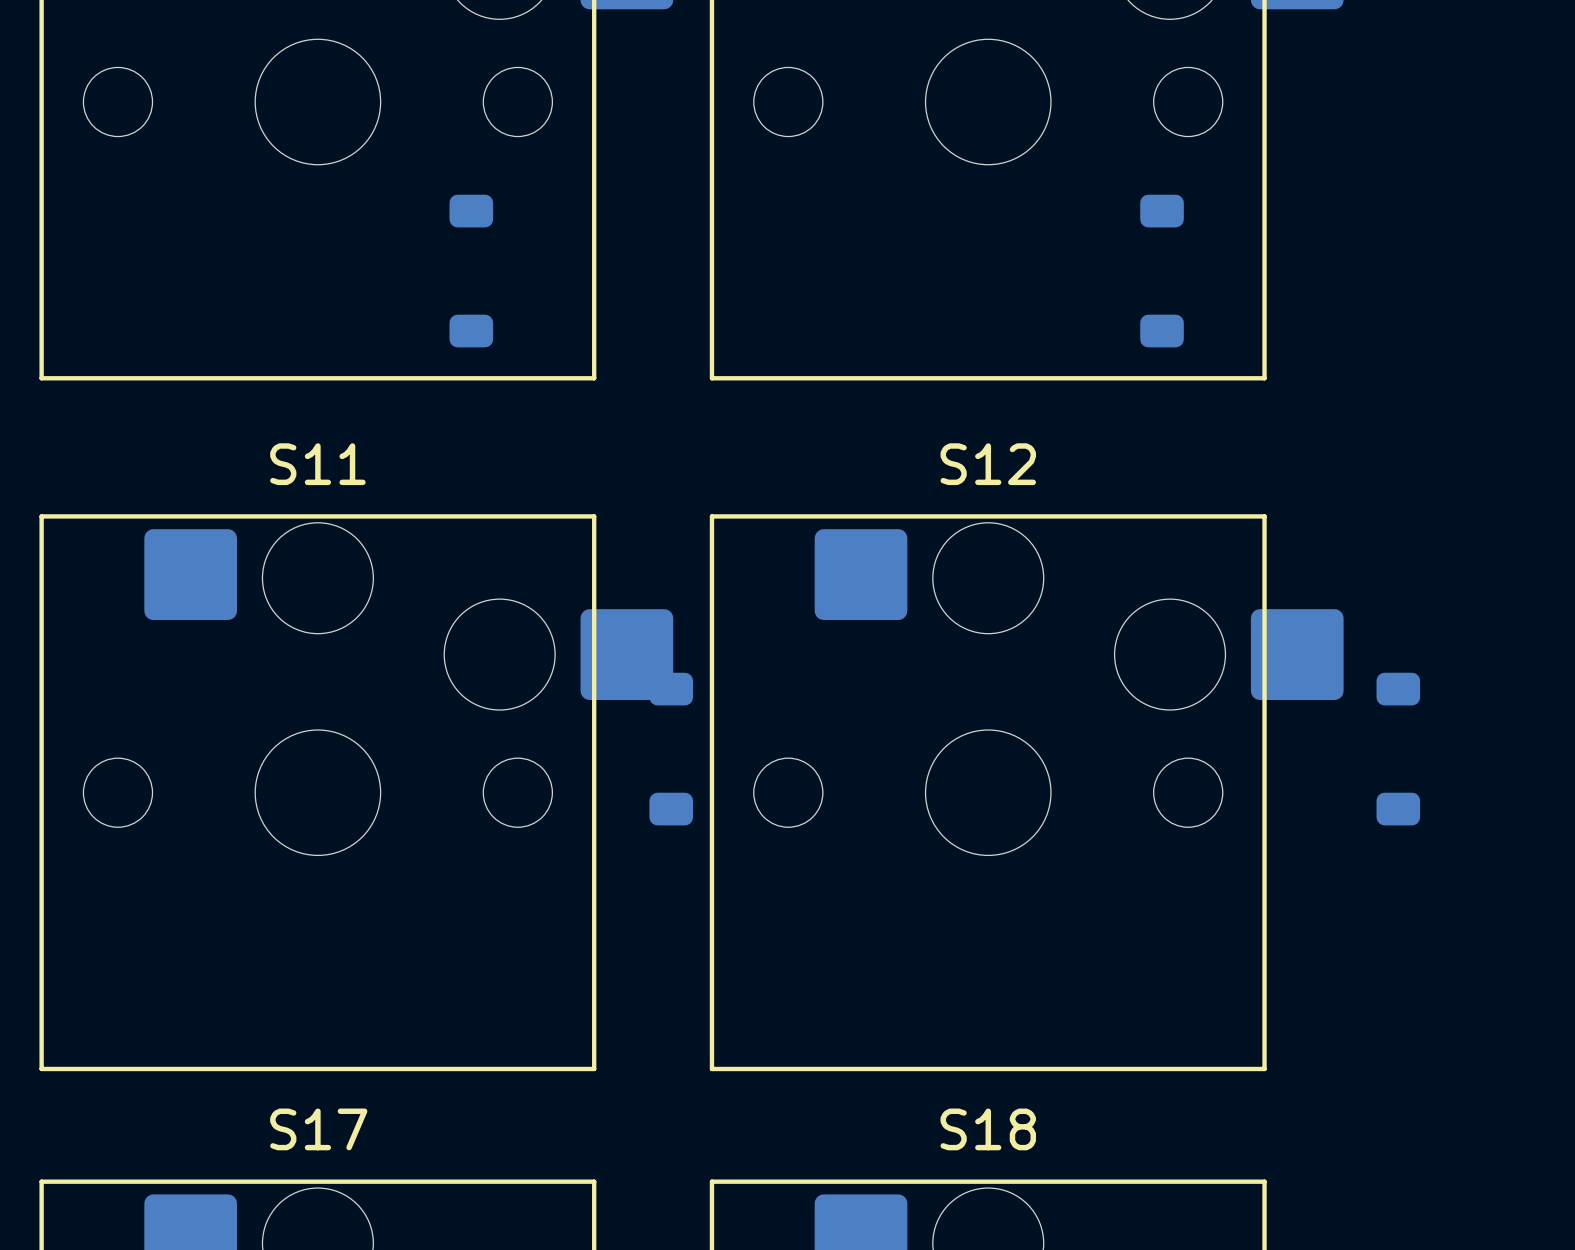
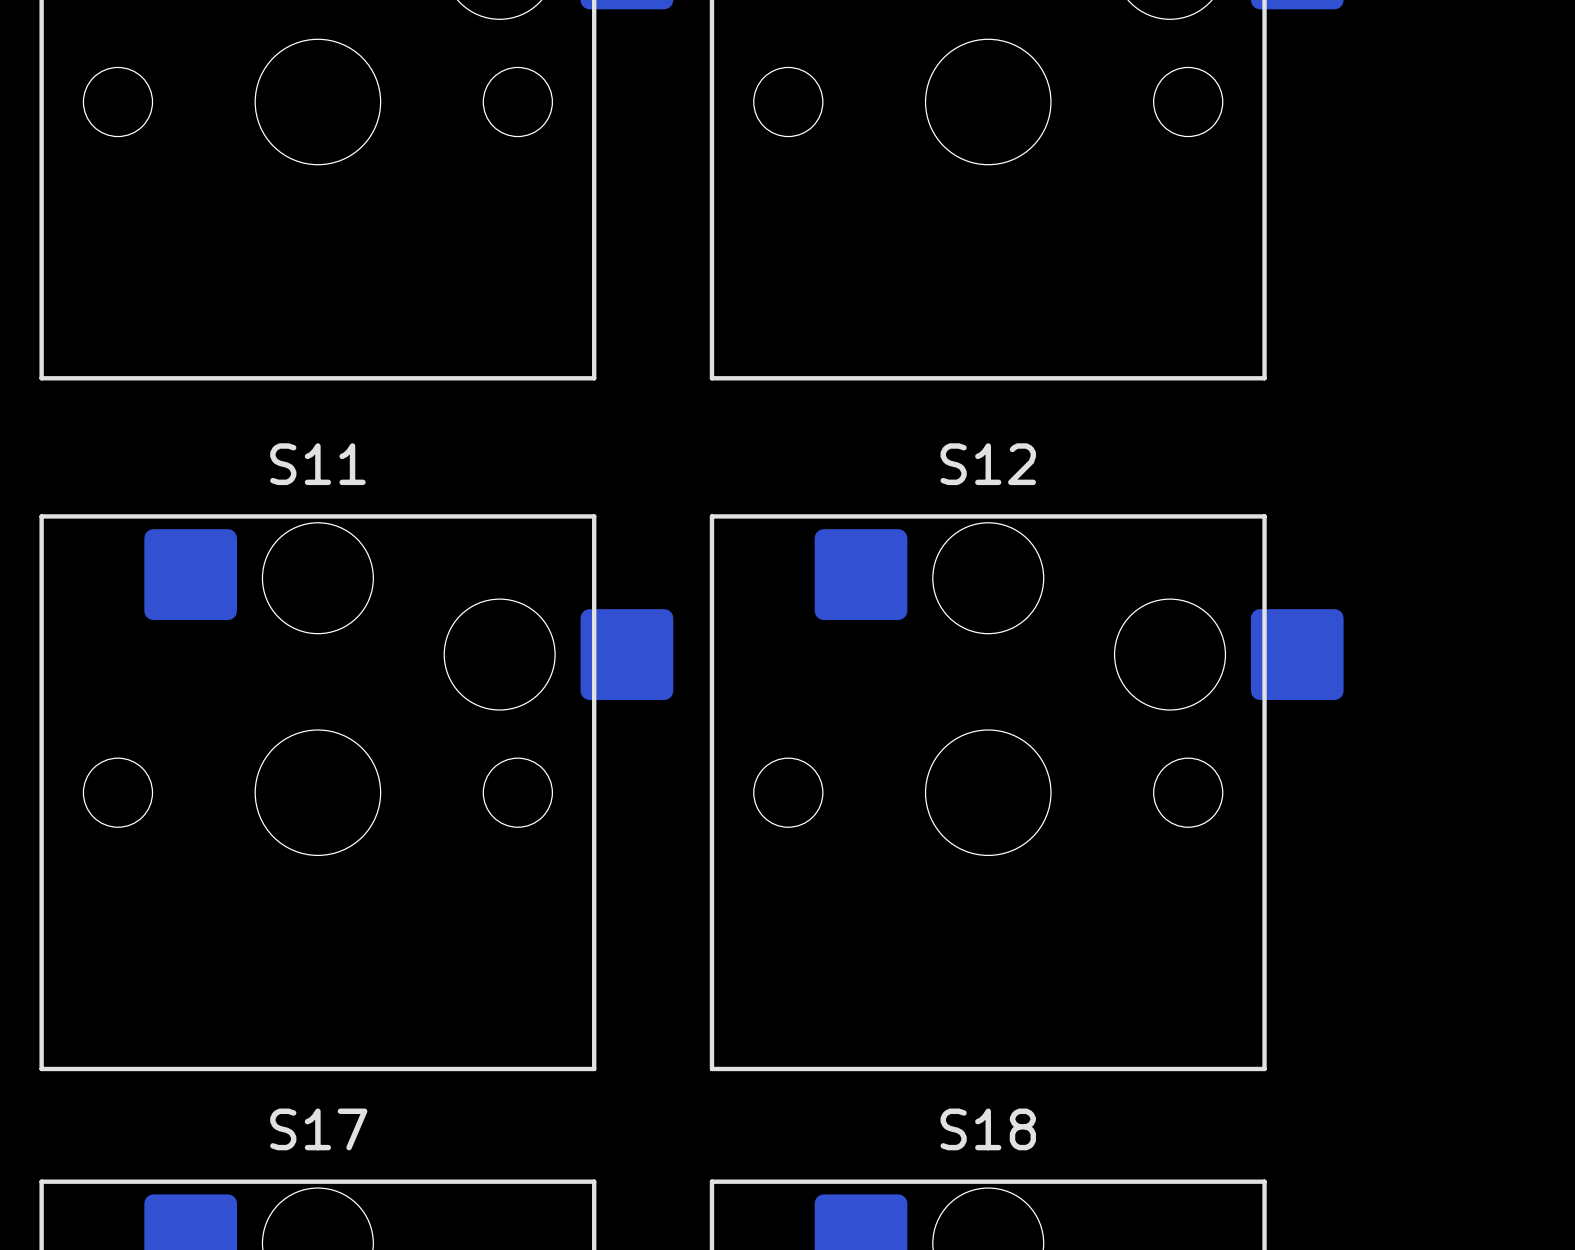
part: (471, 271) -> none
part: (1162, 271) -> none
part: (671, 749) -> none
part: (1398, 749) -> none

